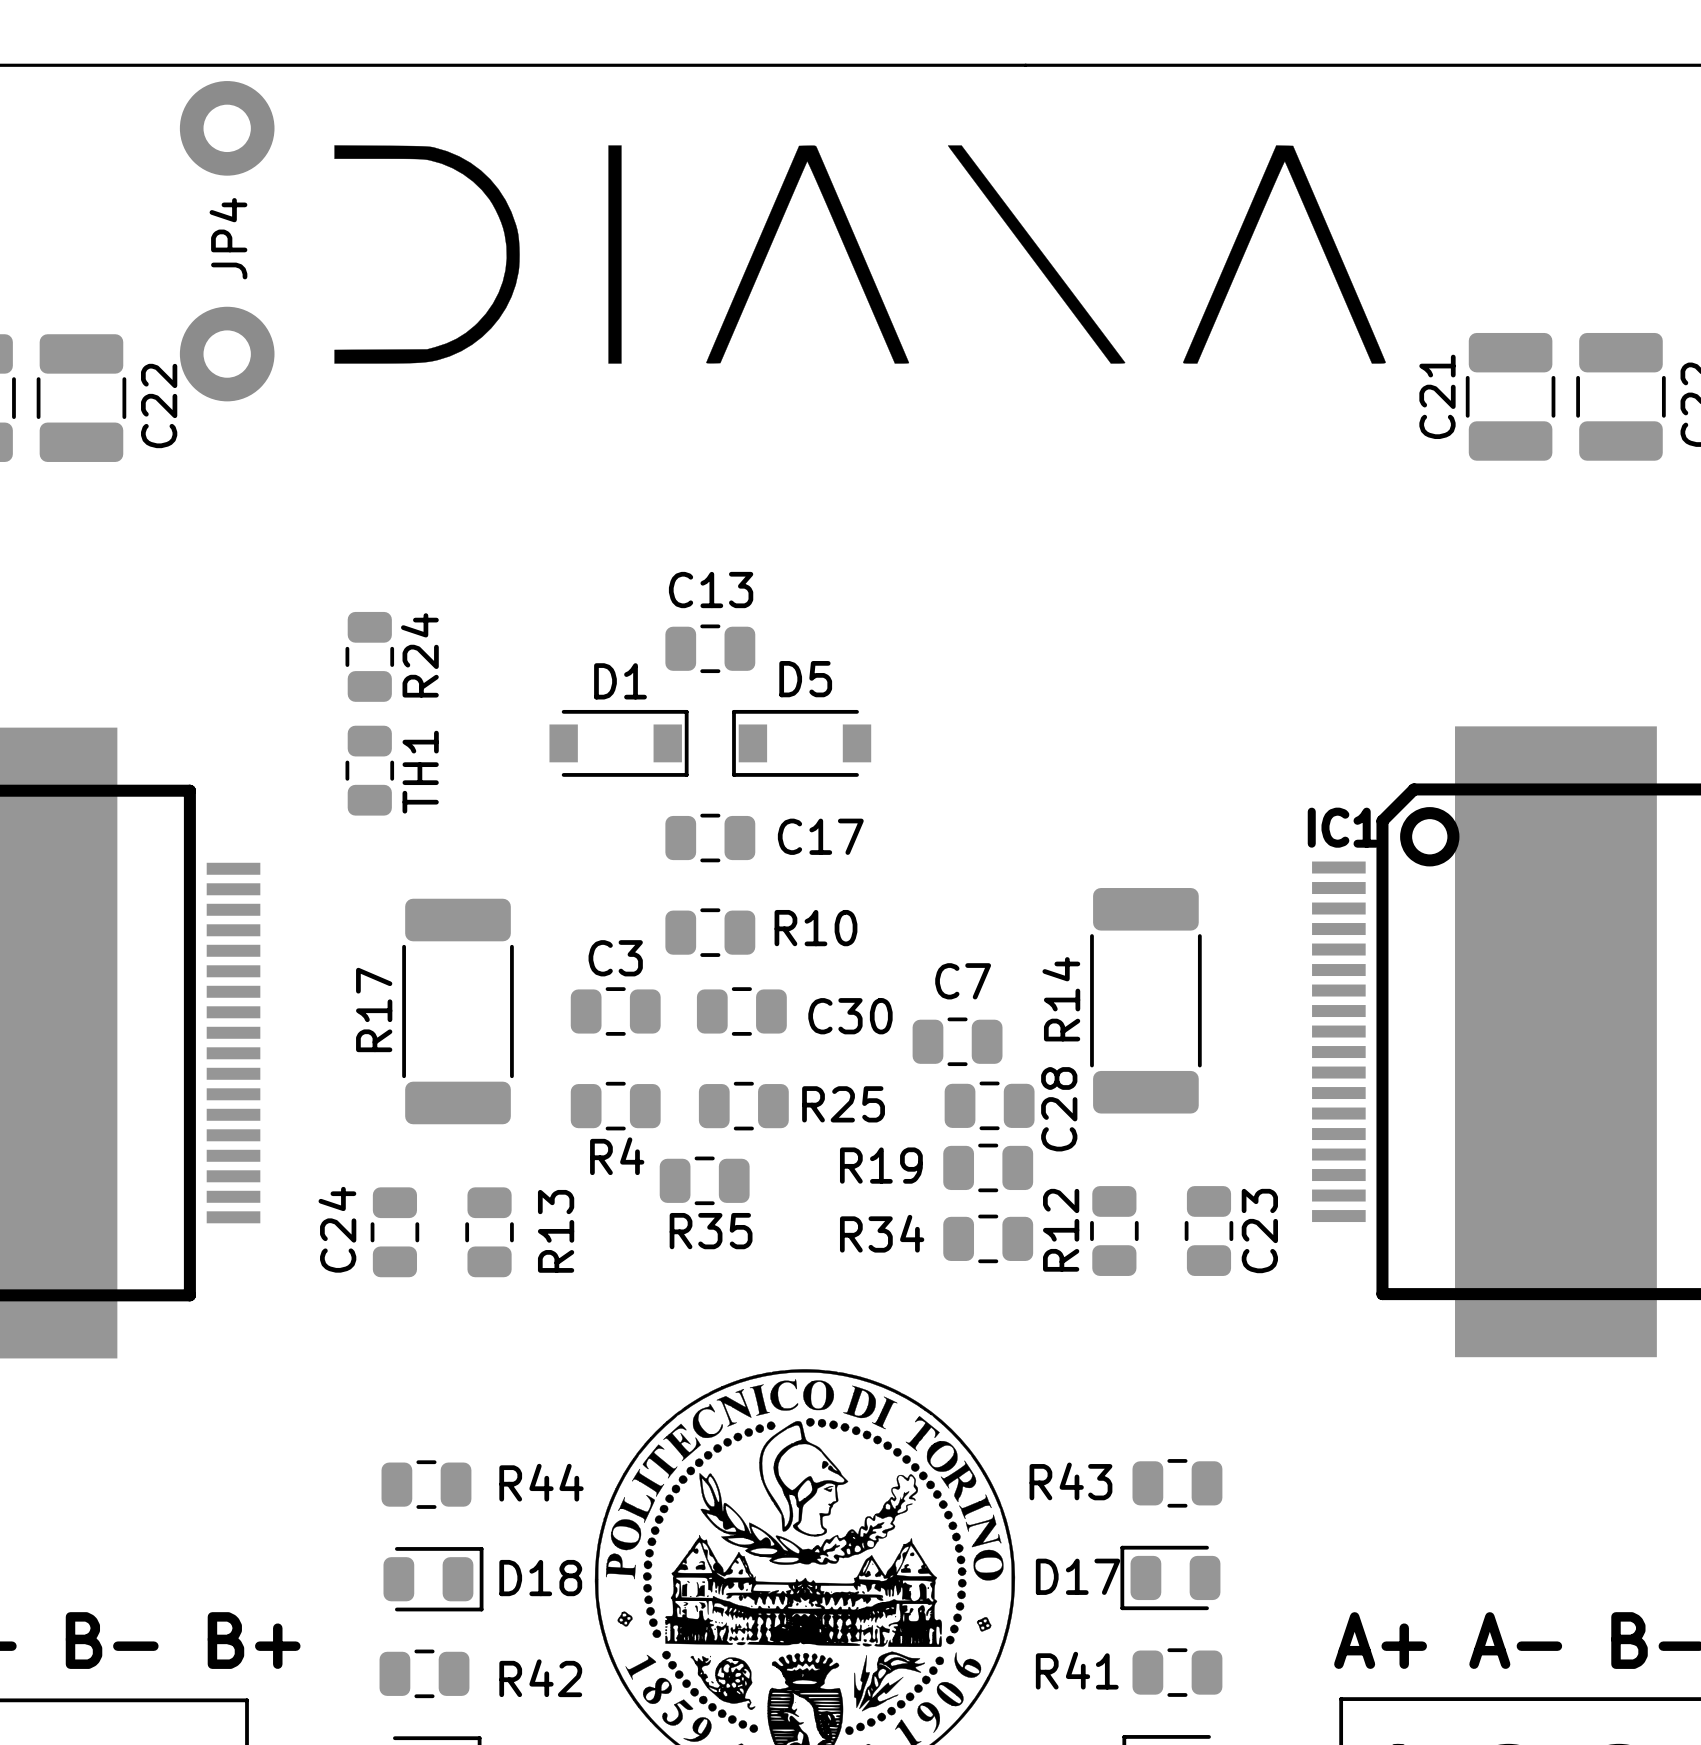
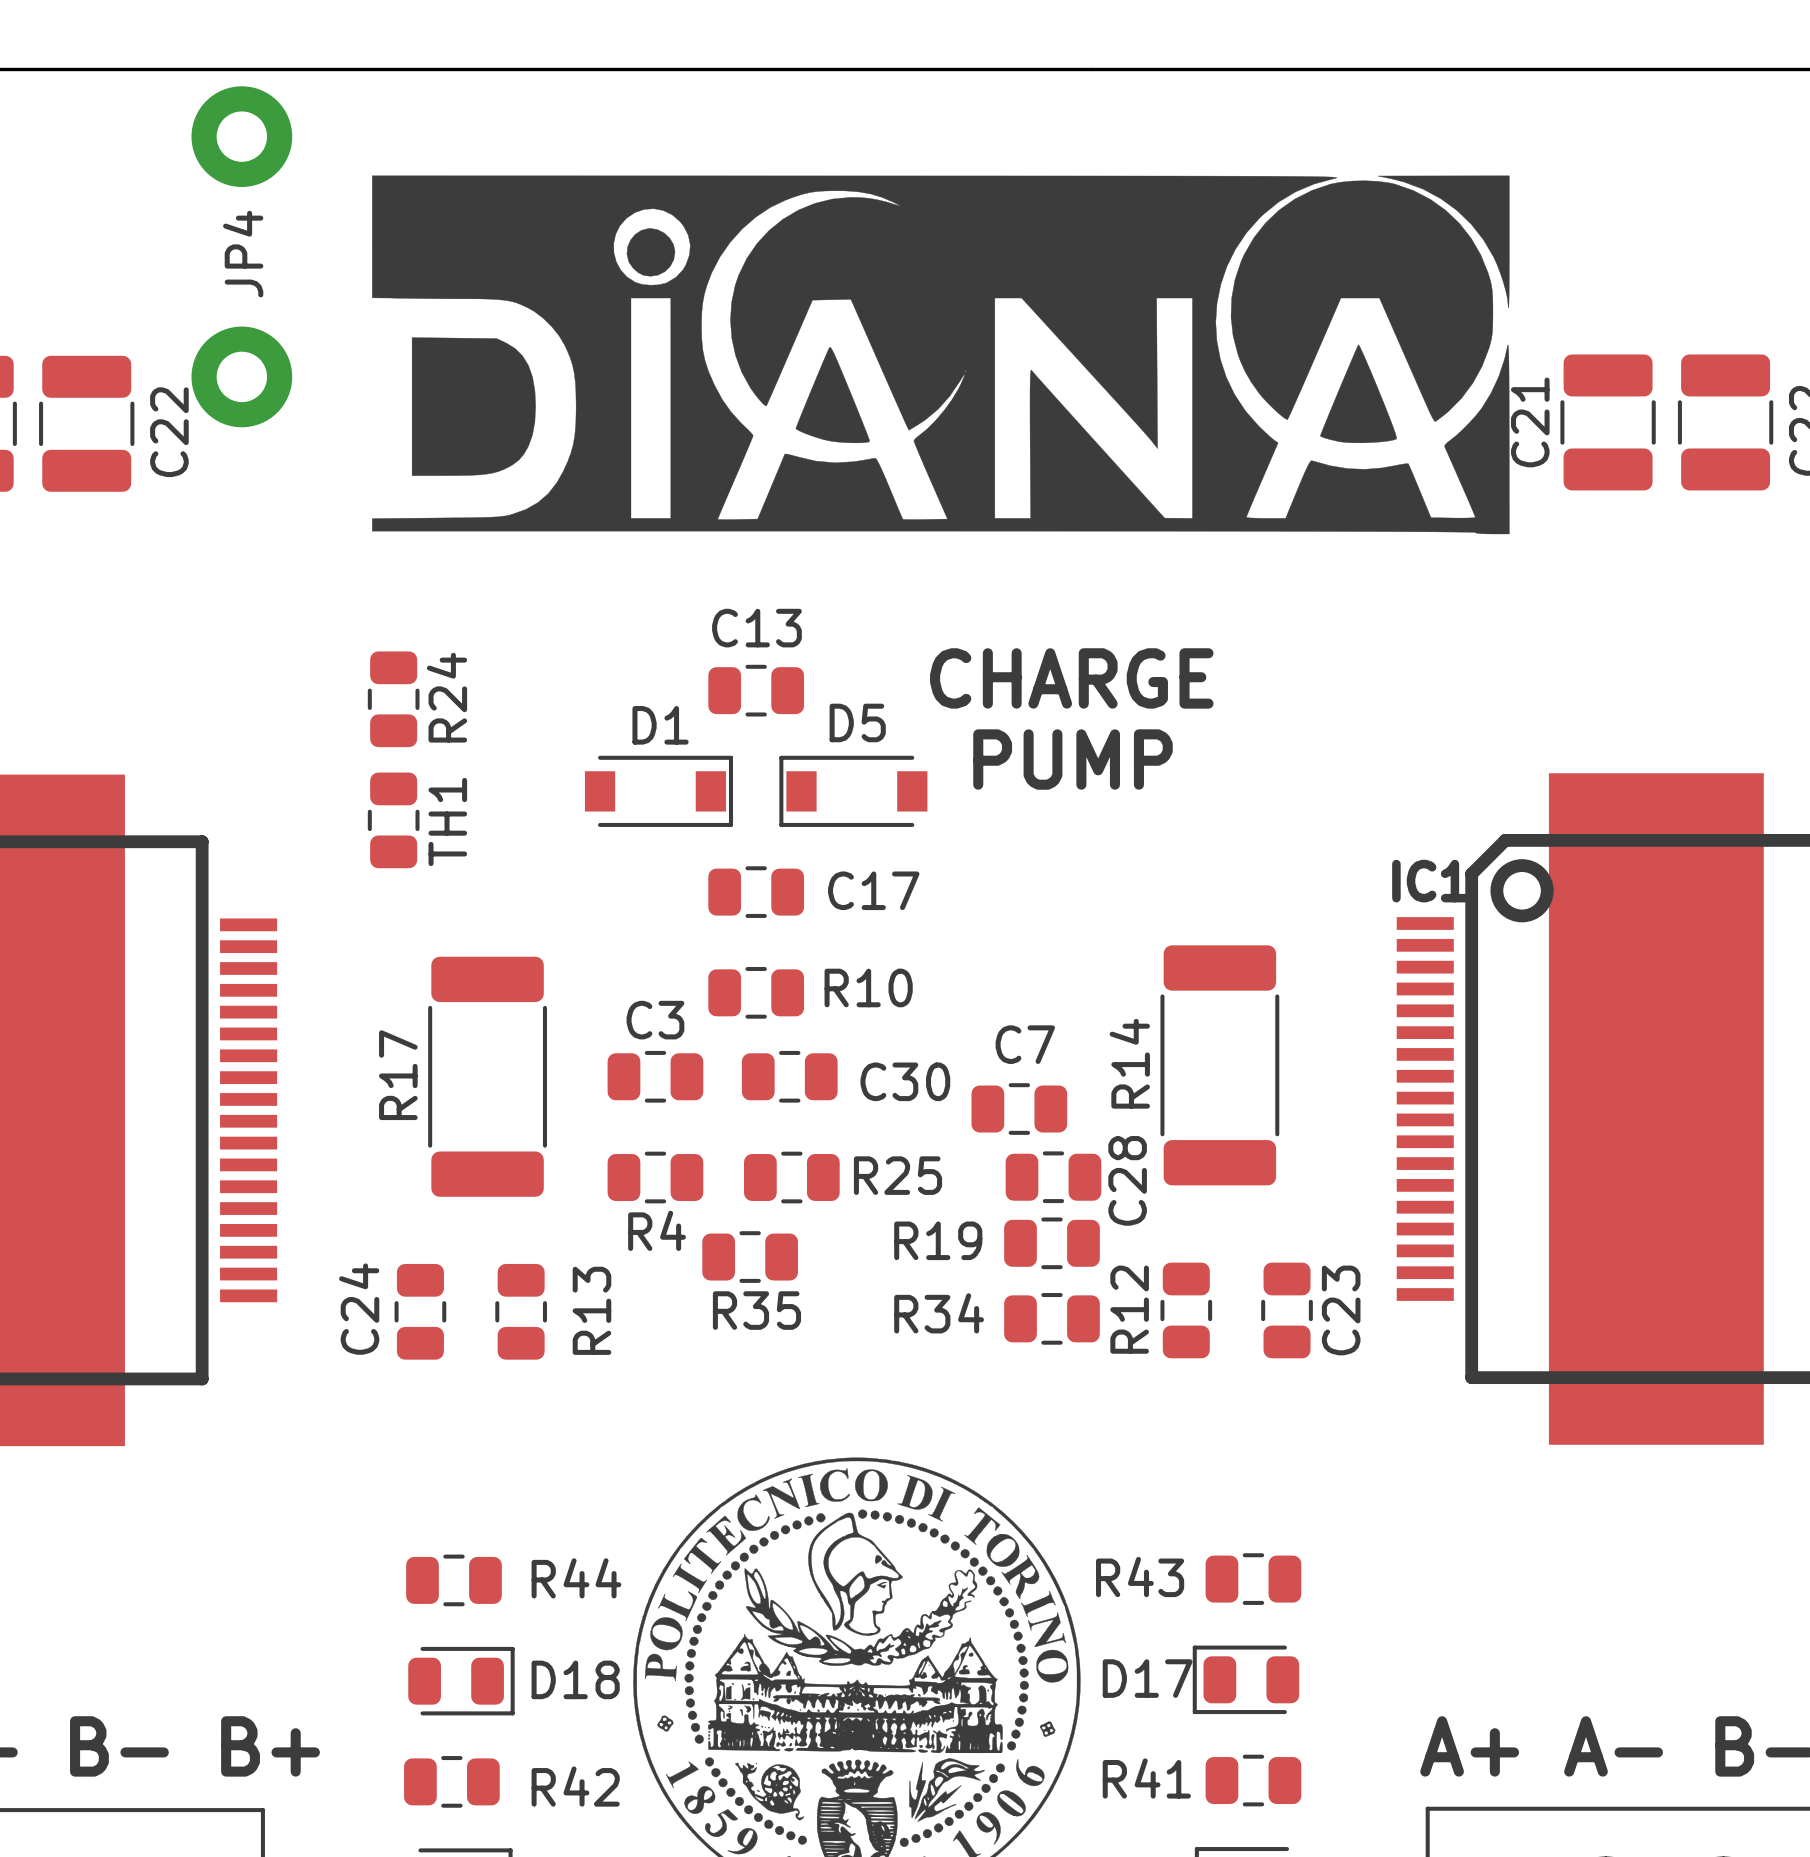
drawing: [334, 145, 1386, 364] -> none
drawing: none -> [372, 175, 1510, 535]
text: none -> CHARGE (1071, 678)
text: none -> PUMP (1072, 759)

